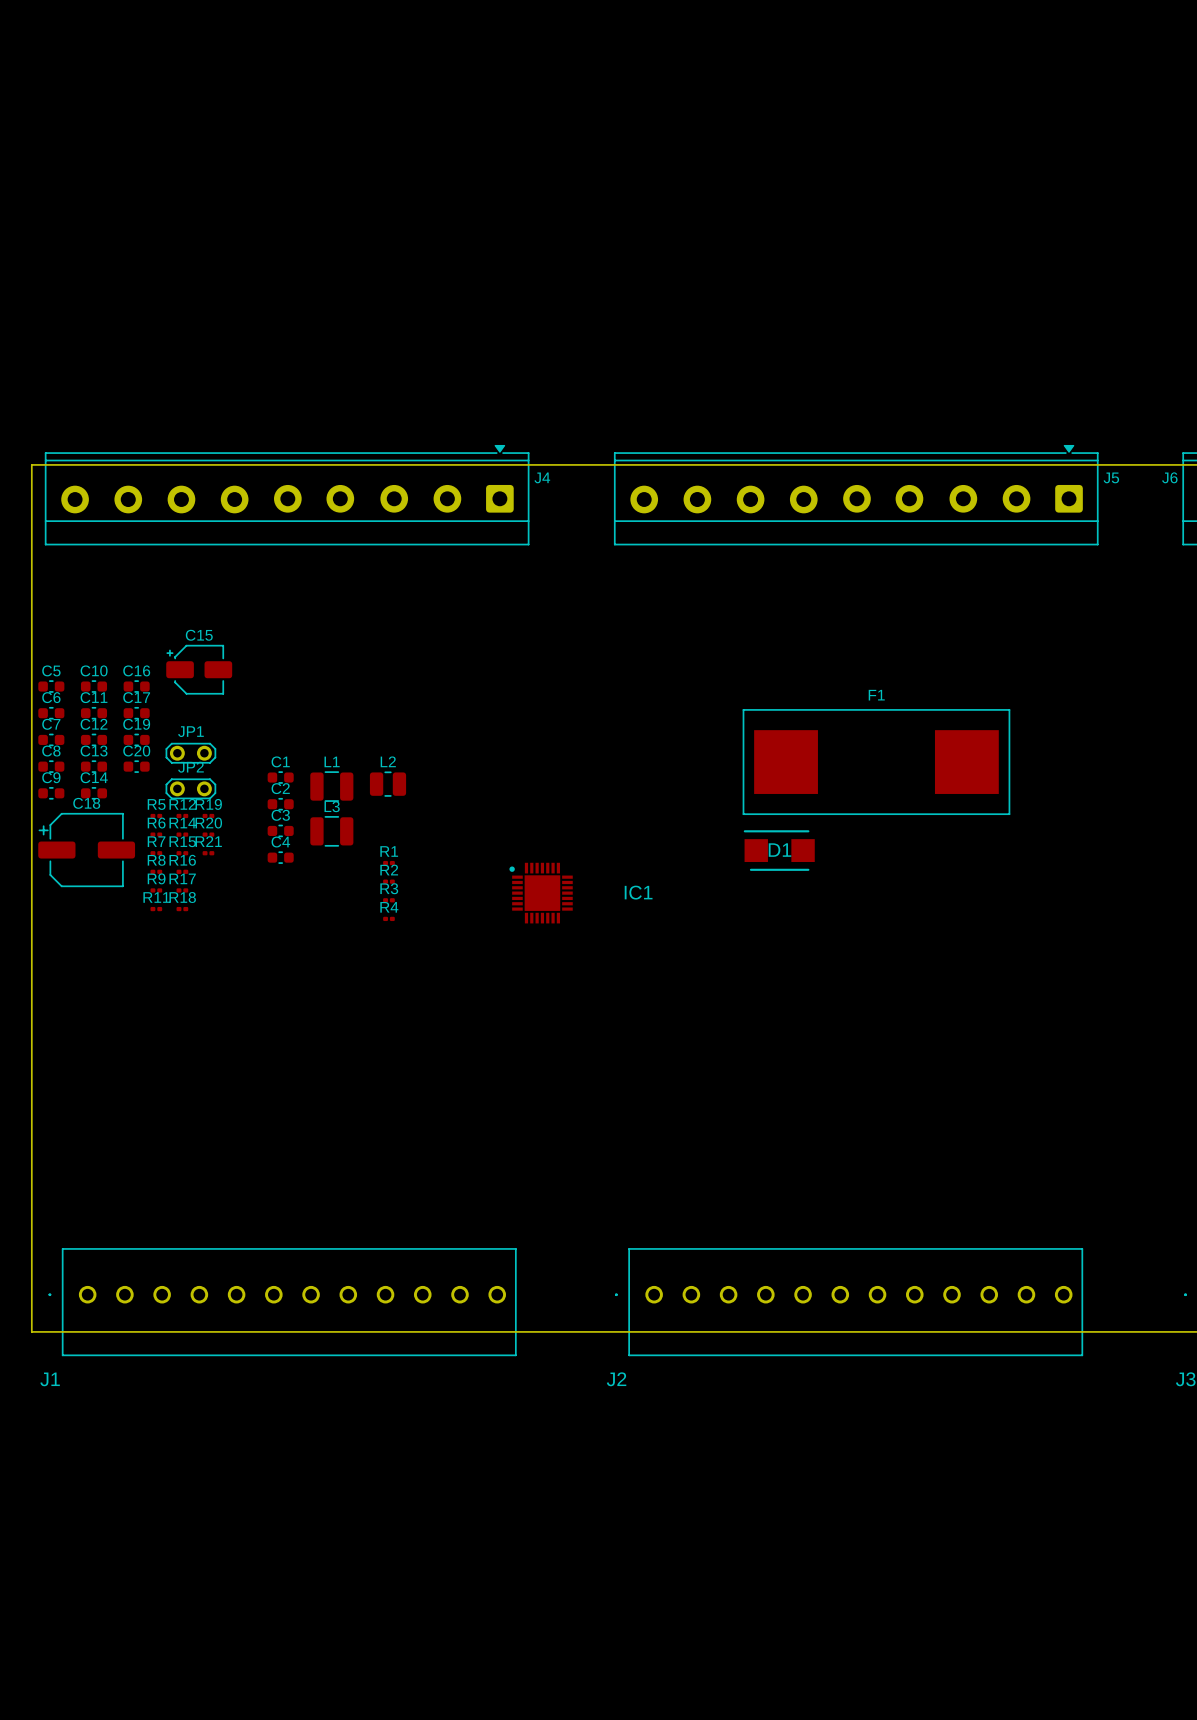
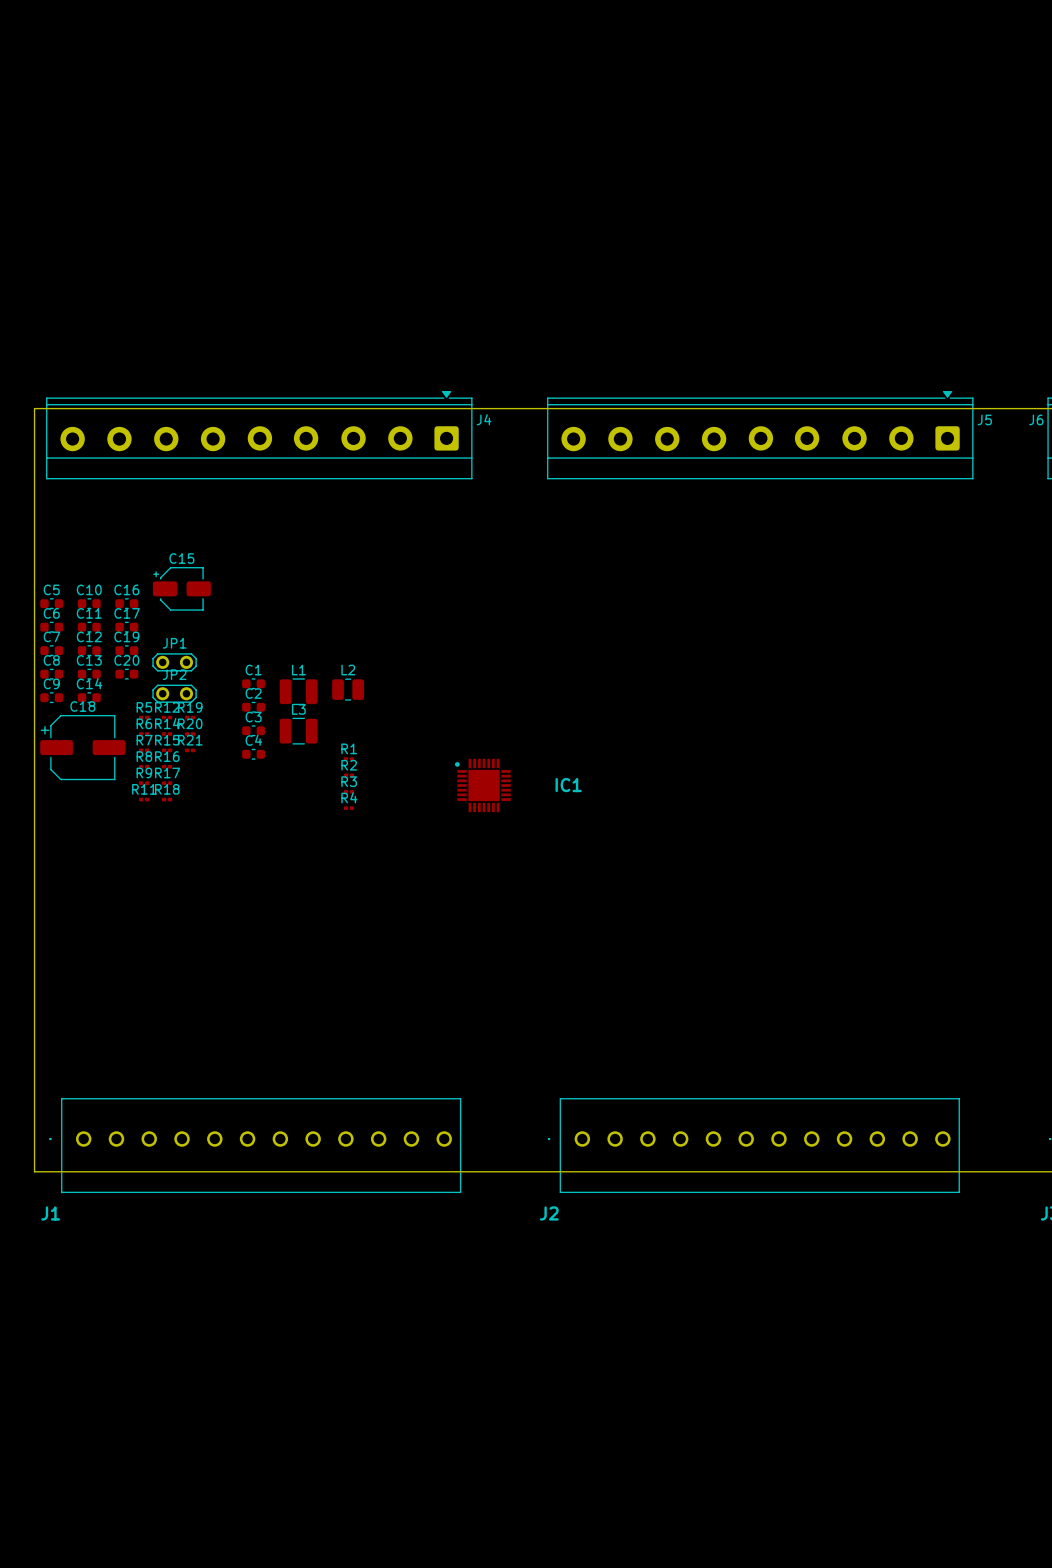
F1: (876, 762) -> none
D1: (779, 850) -> none

